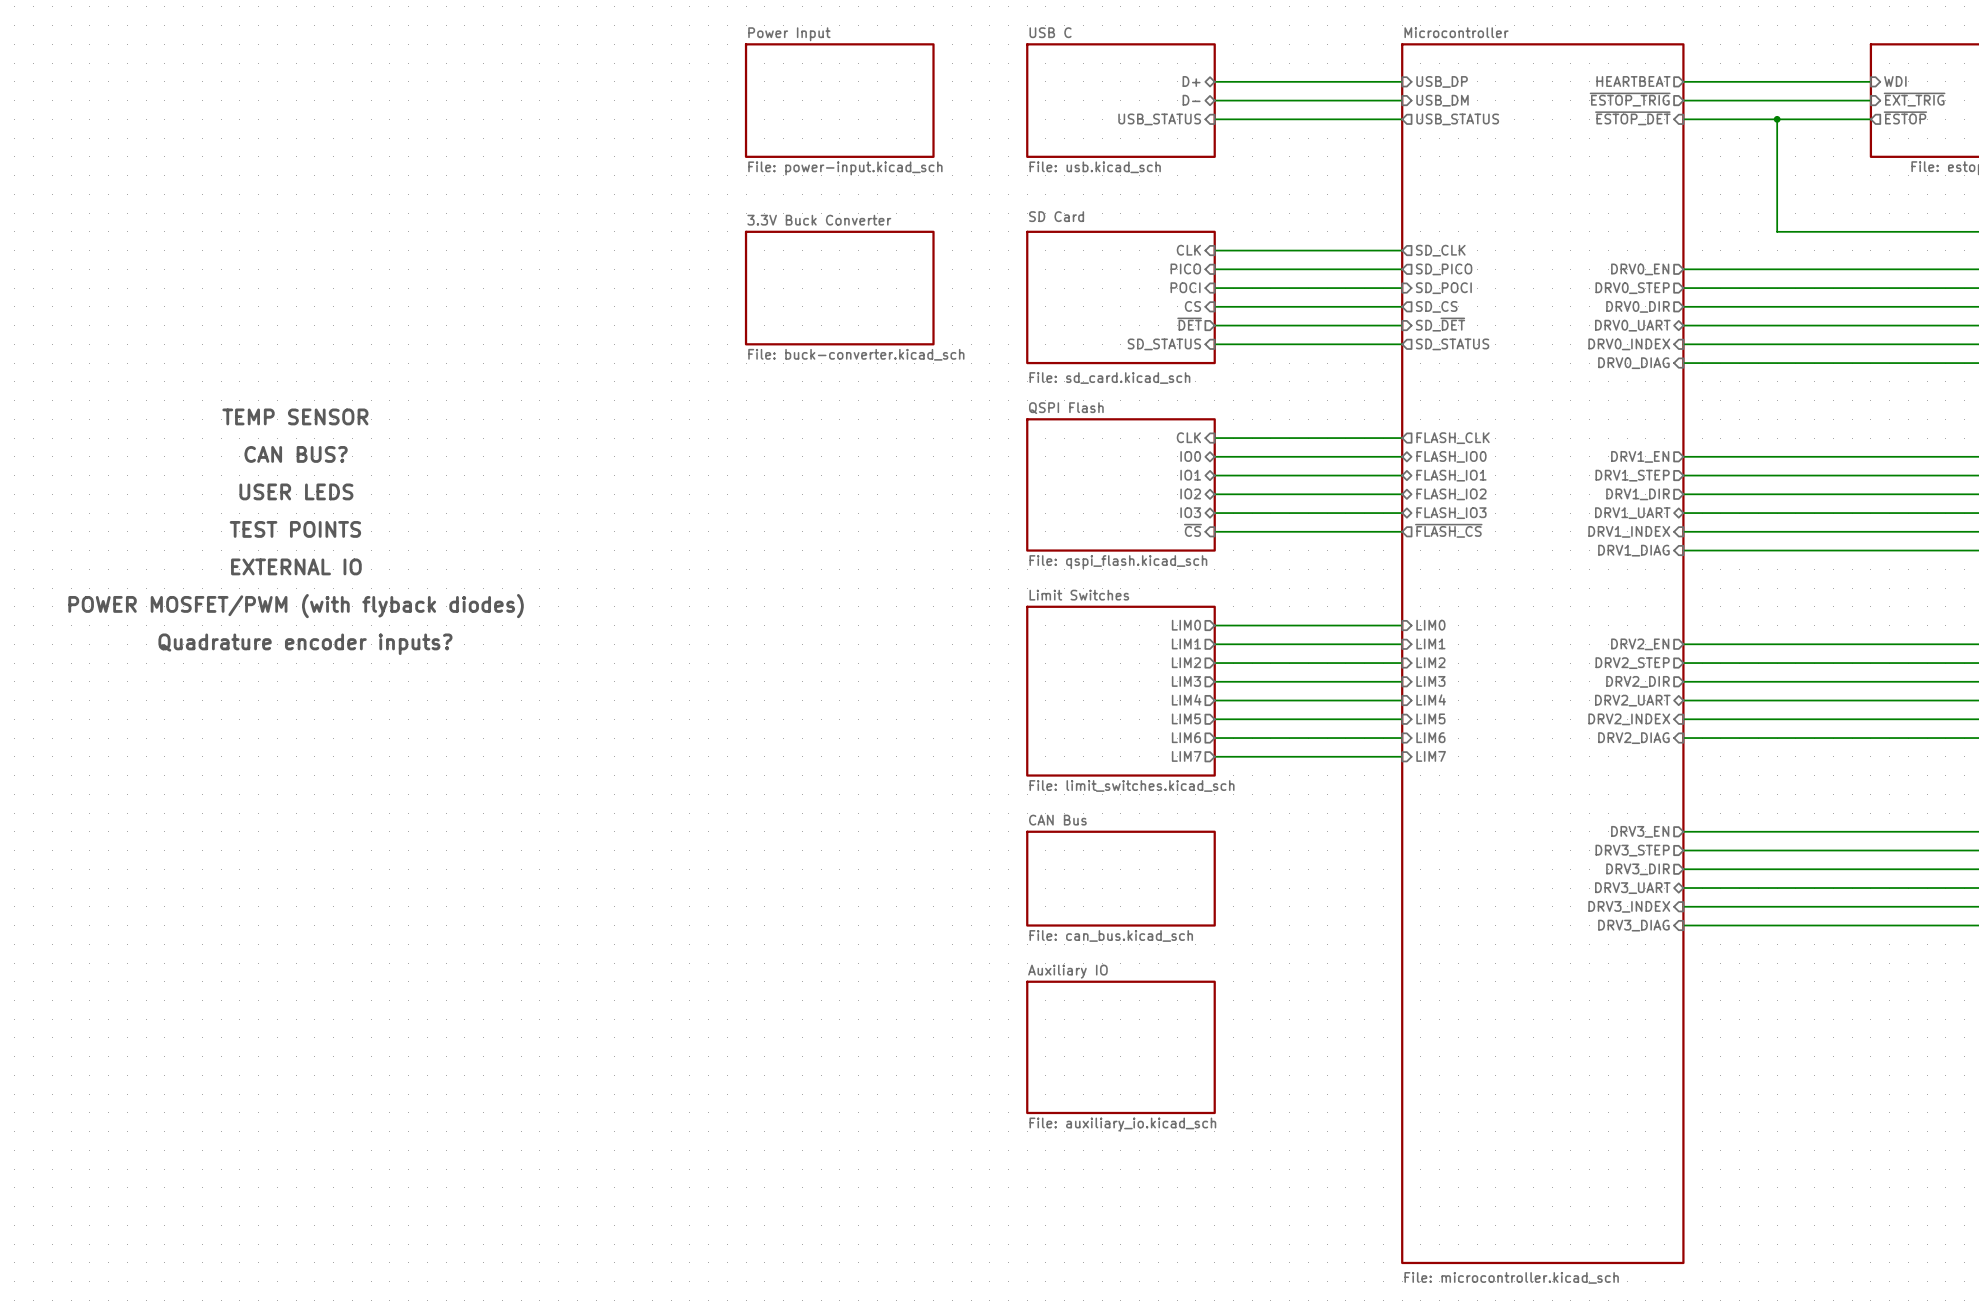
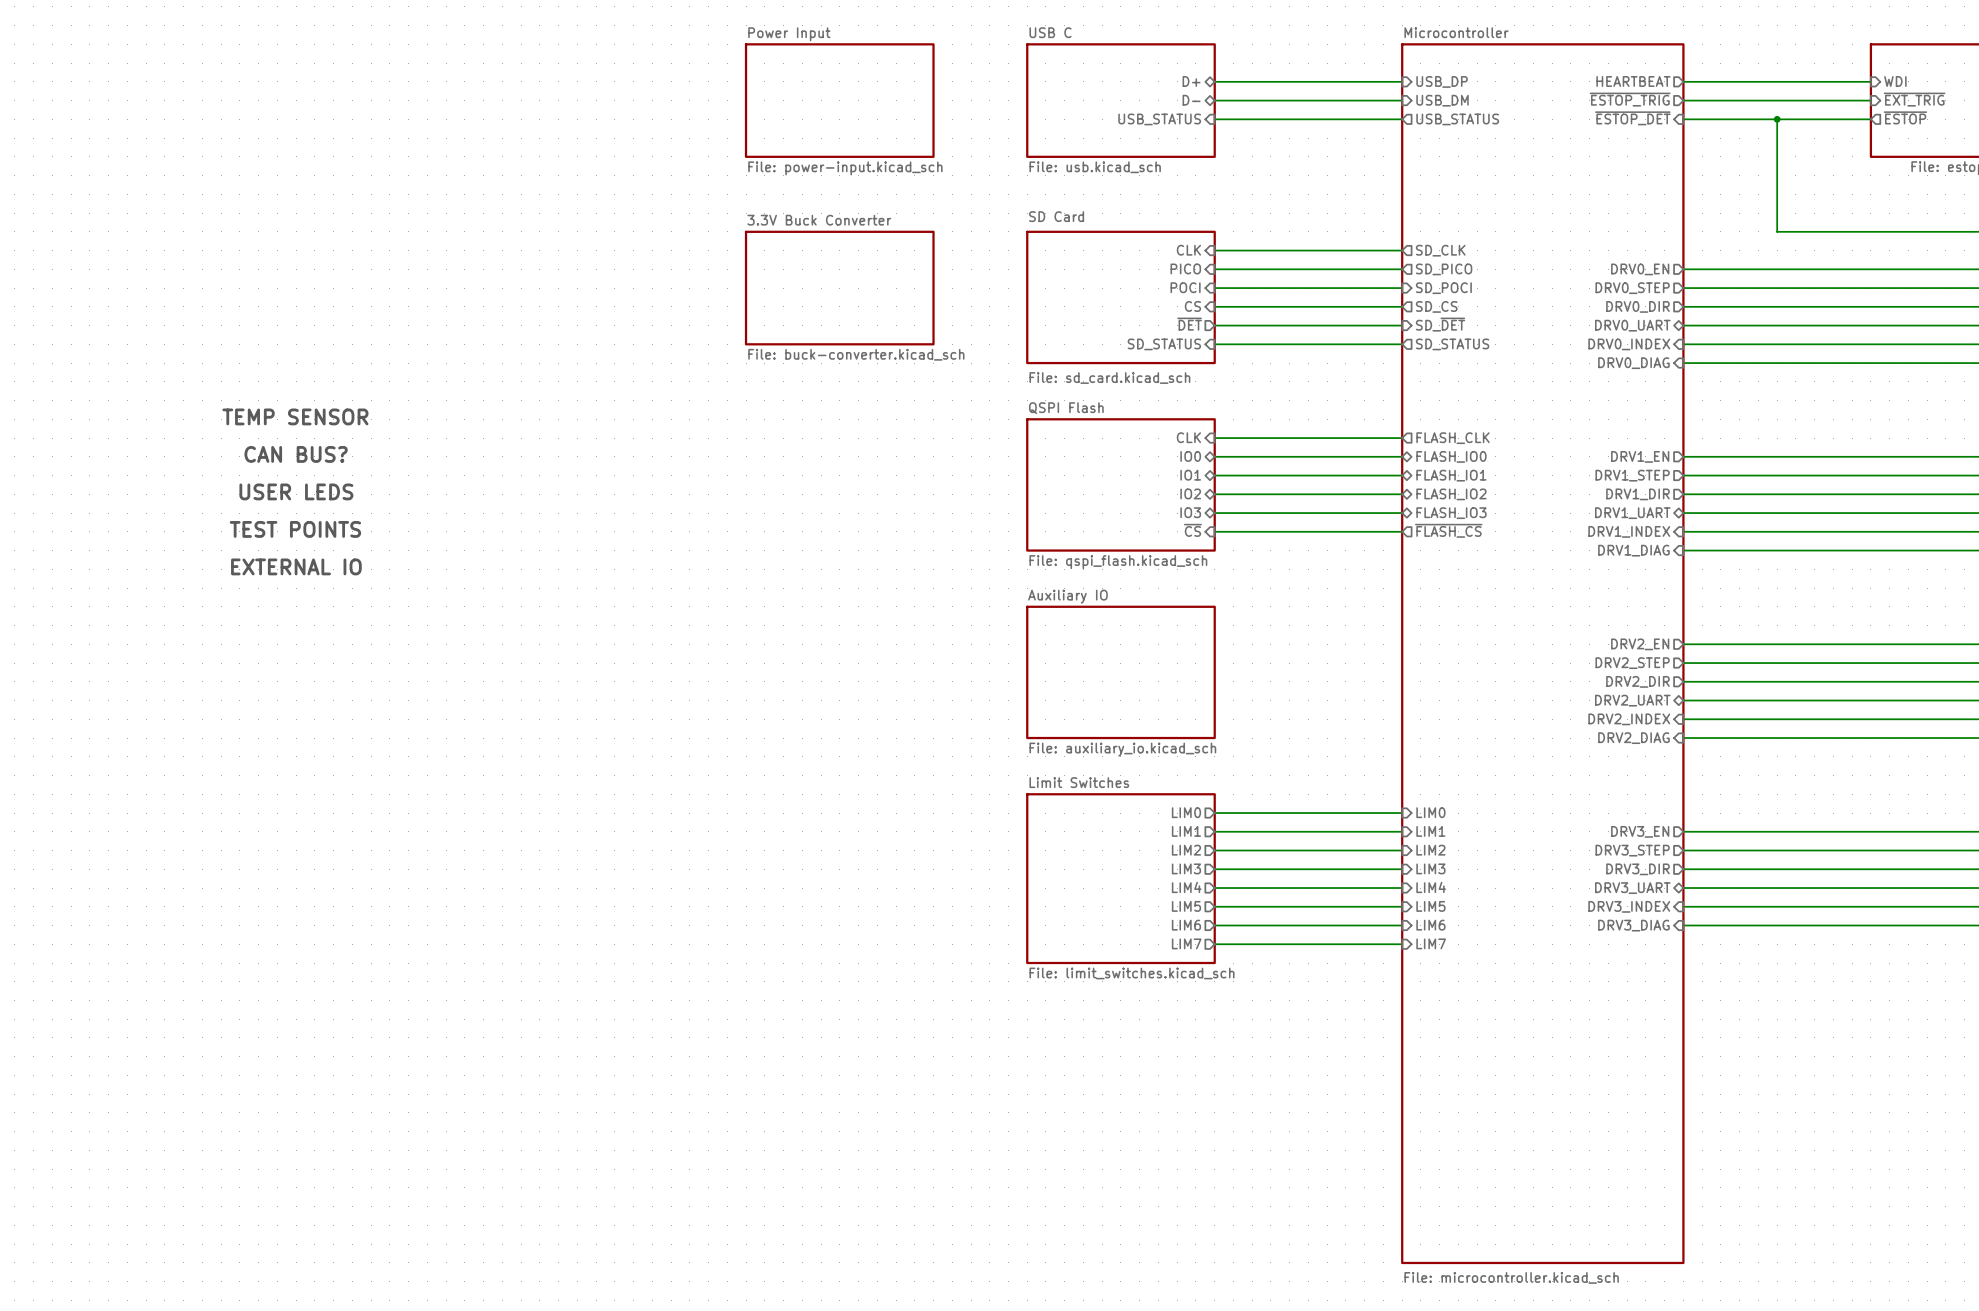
text: POWER MOSFET/PWM (with flyback diodes) (296, 606) -> none
sheet pin: LIM0 (1186, 625) -> none
wire: (1214, 625) (1402, 625) -> none
sheet pin: LIM0 (1430, 625) -> none
sheet pin: LIM1 (1186, 643) -> none
sheet pin: LIM1 (1430, 643) -> none
text: Quadrature encoder inputs? (305, 644) -> none
wire: (1214, 644) (1402, 644) -> (1214, 813) (1402, 813)
sheet pin: LIM2 (1186, 662) -> none
sheet pin: LIM2 (1430, 662) -> none
wire: (1214, 663) (1402, 663) -> (1214, 831) (1402, 831)
sheet Auxiliary IO: none -> File: auxiliary_io.kicad_sch (1120, 672)
sheet pin: LIM3 (1186, 681) -> none
wire: (1214, 681) (1402, 681) -> (1214, 850) (1402, 850)
sheet pin: LIM3 (1430, 681) -> none
sheet Limit Switches: File: limit_switches.kicad_sch (1120, 691) -> none
sheet pin: LIM4 (1186, 699) -> none
sheet pin: LIM4 (1431, 699) -> none
wire: (1214, 700) (1402, 700) -> (1214, 869) (1402, 869)
sheet pin: LIM5 (1186, 718) -> none
sheet pin: LIM5 (1430, 718) -> none
wire: (1214, 719) (1402, 719) -> (1214, 888) (1402, 888)
sheet pin: LIM6 (1186, 737) -> none
sheet pin: LIM6 (1430, 737) -> none
wire: (1214, 738) (1402, 738) -> (1214, 906) (1402, 906)
sheet pin: LIM7 (1186, 756) -> none
wire: (1214, 756) (1402, 756) -> (1214, 925) (1402, 925)
sheet pin: LIM7 (1431, 756) -> none
sheet pin: none -> LIM0 (1186, 812)
sheet pin: none -> LIM0 (1430, 812)
sheet pin: none -> LIM1 (1186, 831)
sheet pin: none -> LIM1 (1430, 831)
sheet pin: none -> LIM2 (1186, 850)
sheet pin: none -> LIM2 (1430, 850)
sheet pin: none -> LIM3 (1186, 868)
sheet pin: none -> LIM3 (1430, 868)
sheet CAN Bus: File: can_bus.kicad_sch (1120, 878) -> none
sheet Limit Switches: none -> File: limit_switches.kicad_sch (1120, 878)
sheet pin: none -> LIM4 (1186, 887)
sheet pin: none -> LIM4 (1431, 887)
sheet pin: none -> LIM5 (1186, 906)
sheet pin: none -> LIM5 (1430, 906)
sheet pin: none -> LIM6 (1186, 925)
sheet pin: none -> LIM6 (1430, 925)
sheet pin: none -> LIM7 (1186, 943)
sheet pin: none -> LIM7 (1431, 943)
wire: none -> (1214, 944) (1402, 944)
sheet Auxiliary IO: File: auxiliary_io.kicad_sch (1120, 1047) -> none

